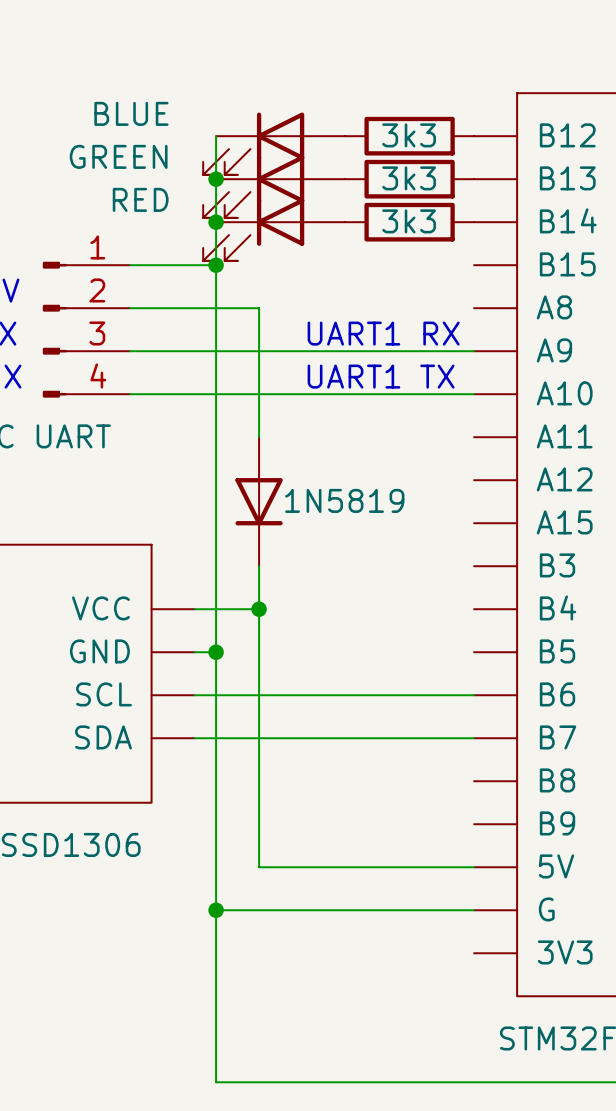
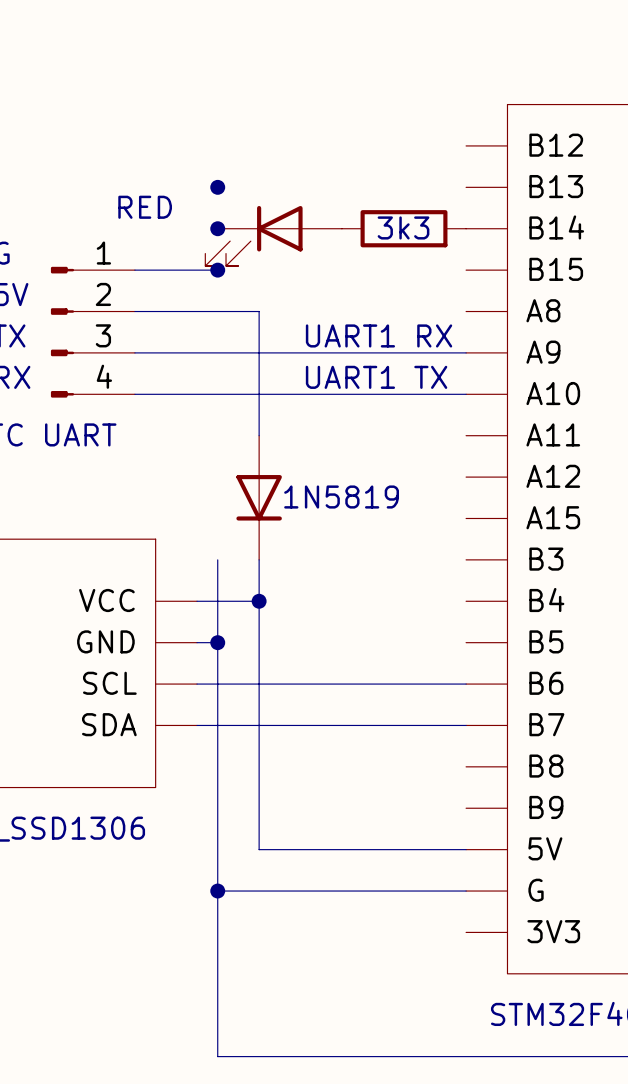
wire: (216, 136) (216, 566) -> none
part: 3k3 (409, 136) -> none
part: BLUE (274, 143) -> none
part: 3k3 (409, 179) -> none
part: GREEN (274, 186) -> none

